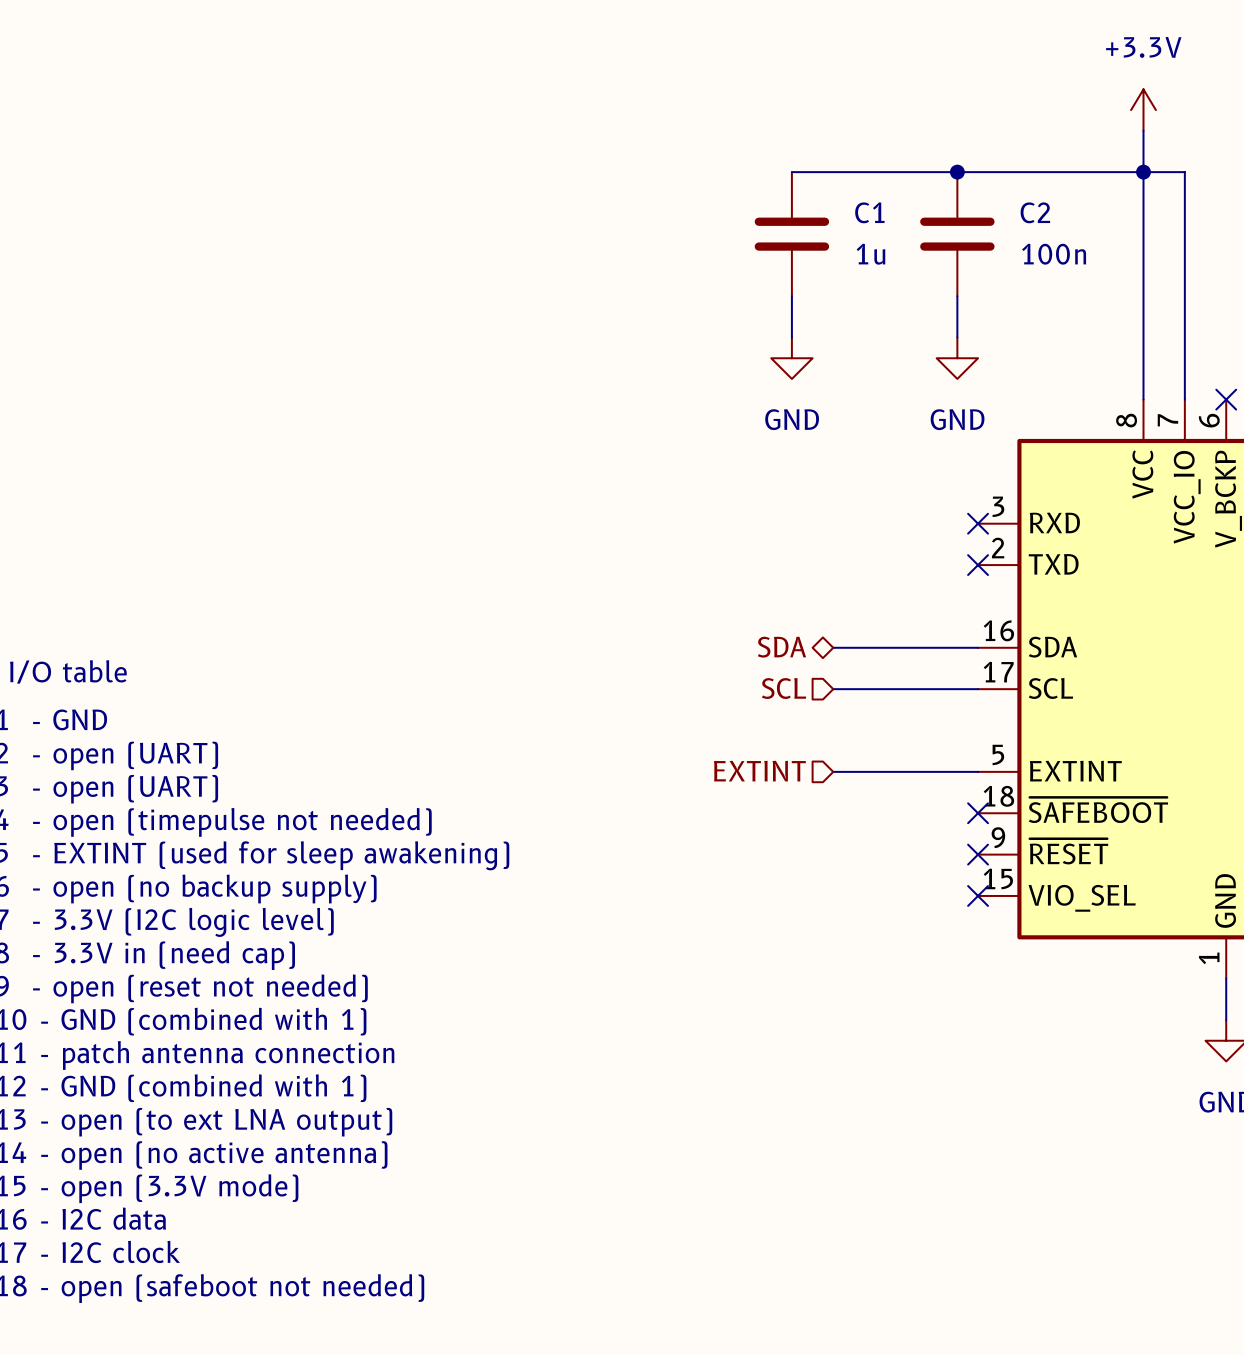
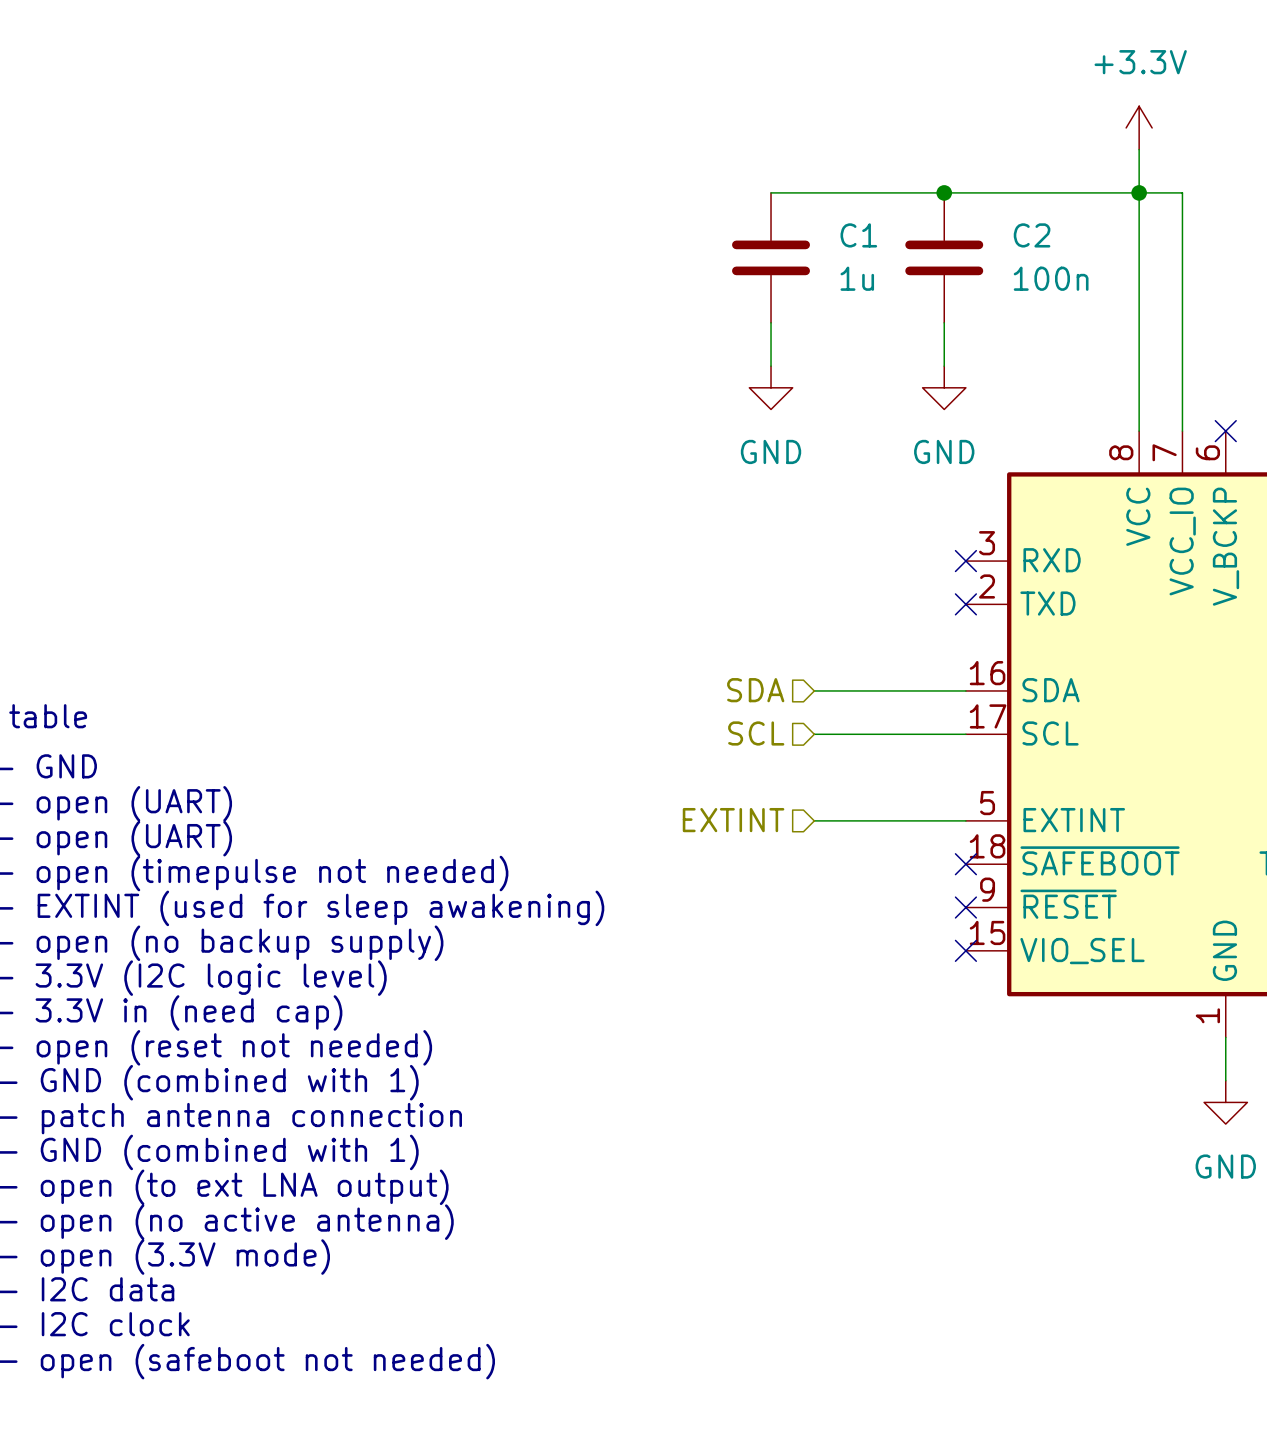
hierarchical label shape: bidirectional (781, 647) -> input (755, 690)

